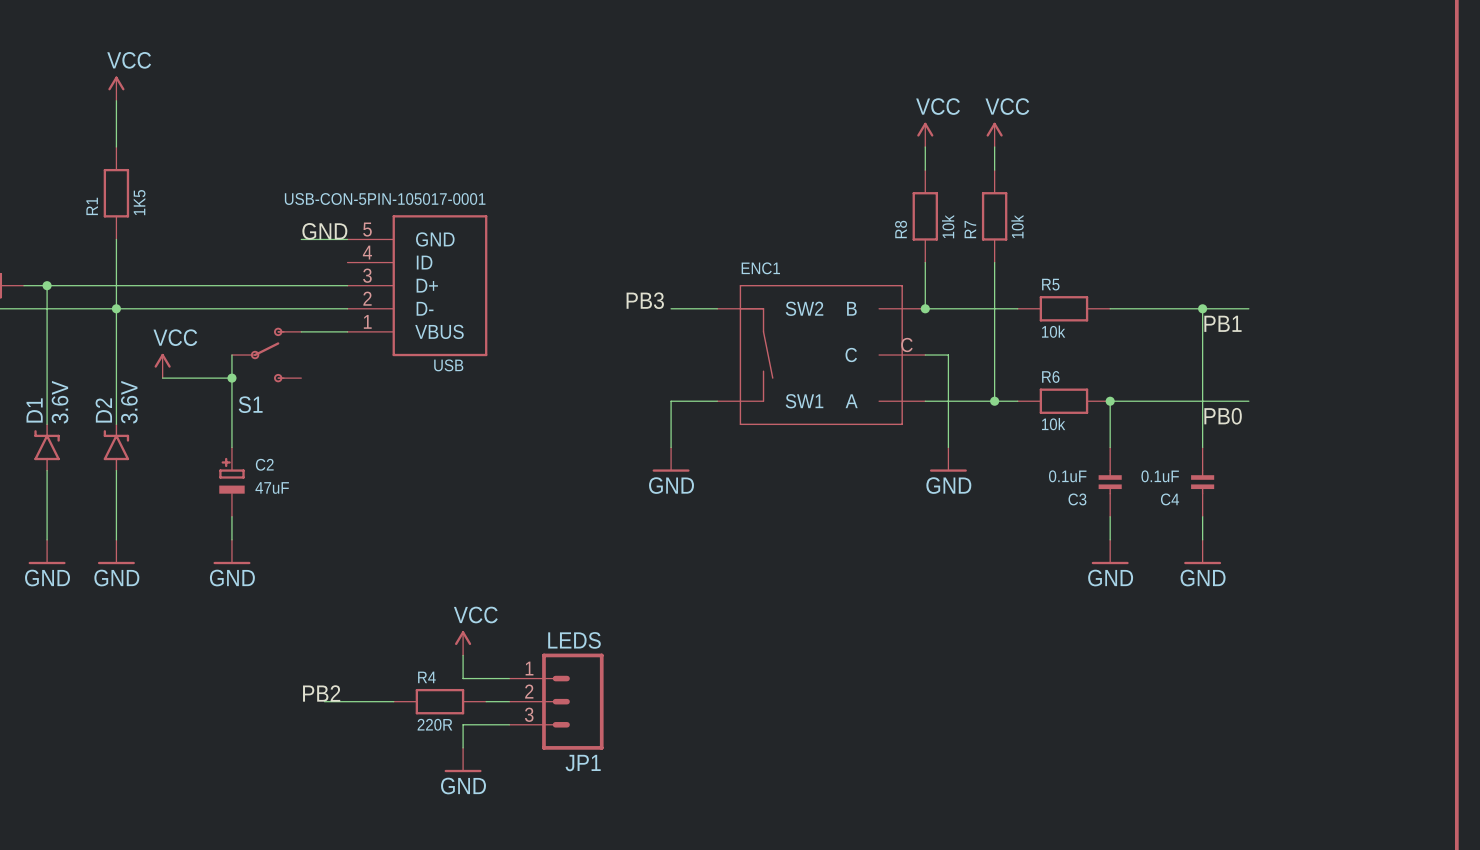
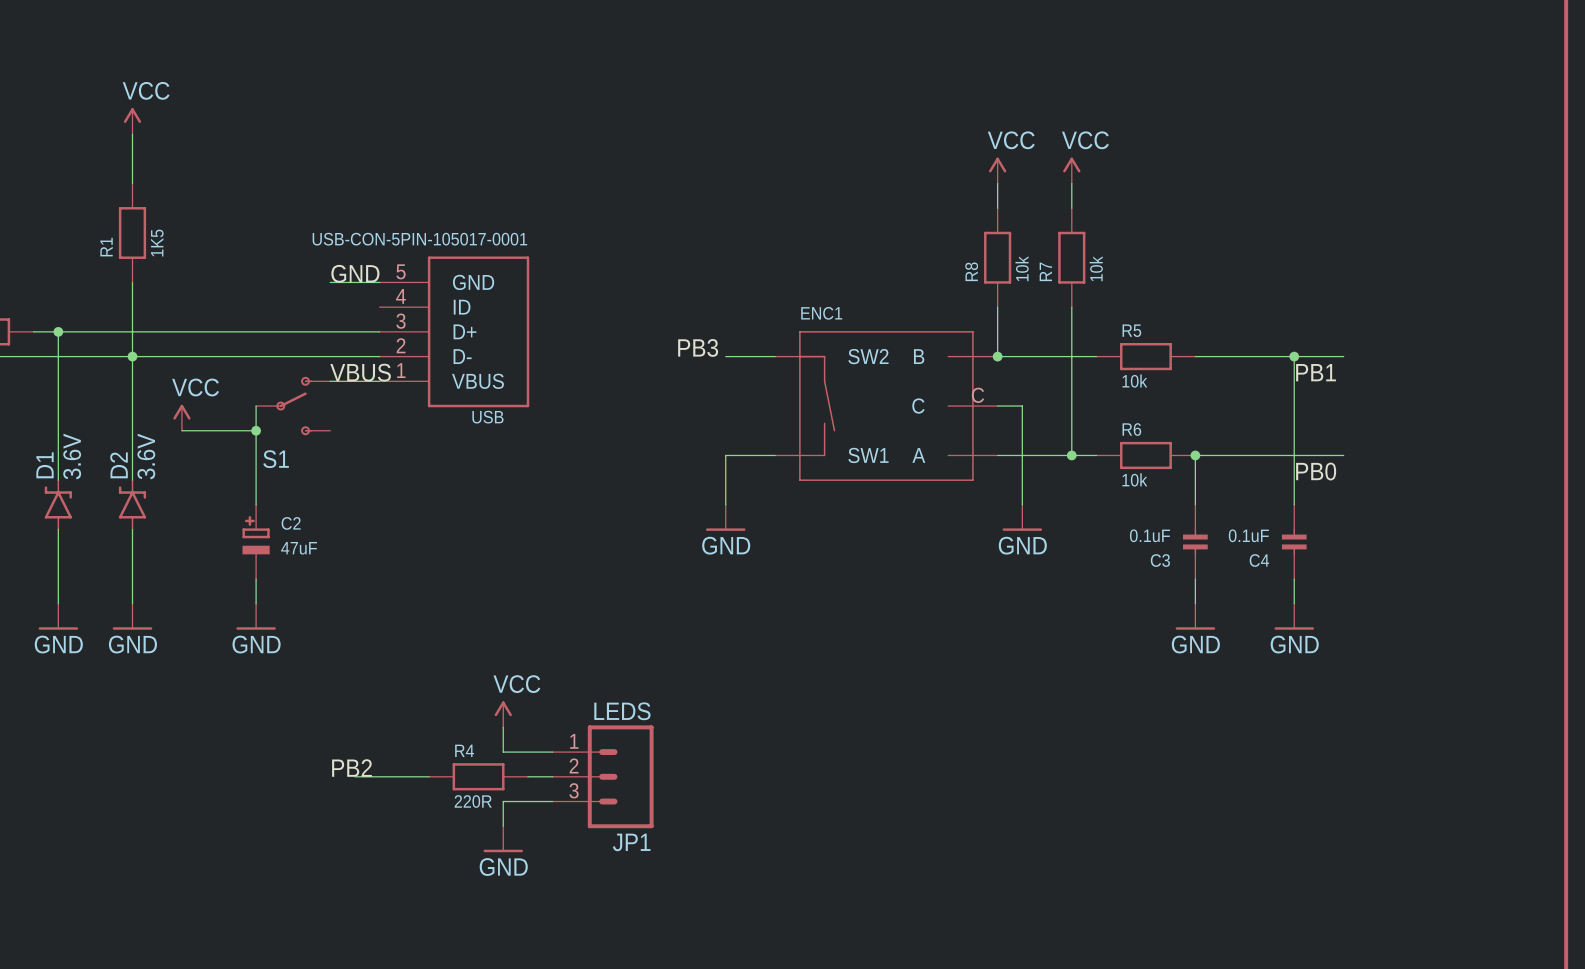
label: none -> VBUS (360, 372)

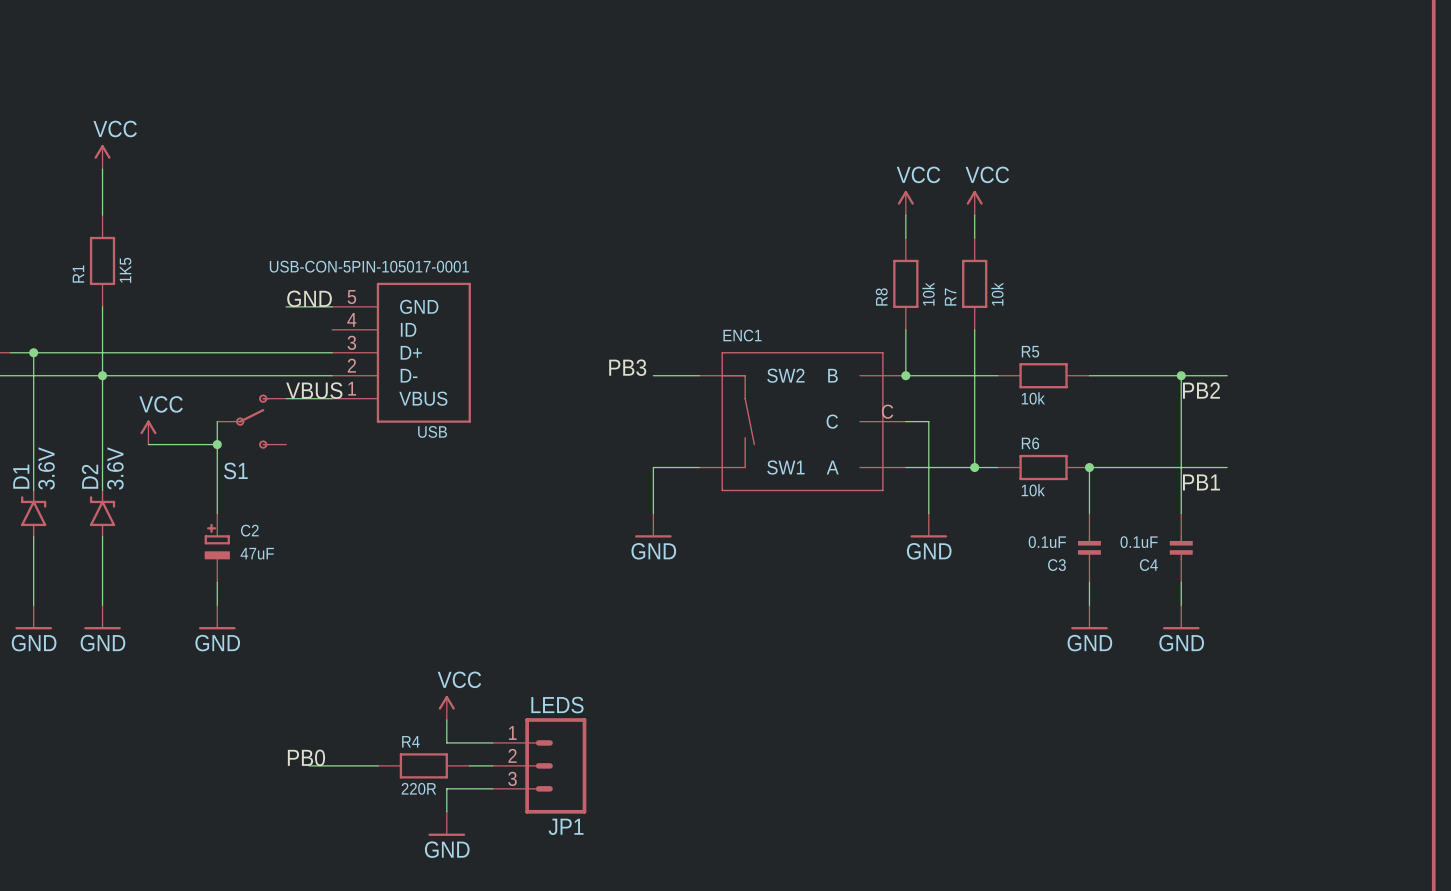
label: PB1 (1316, 372) -> PB2 (1201, 390)
label: PB0 (1316, 471) -> PB1 (1201, 482)
label: PB2 (351, 768) -> PB0 (306, 757)

